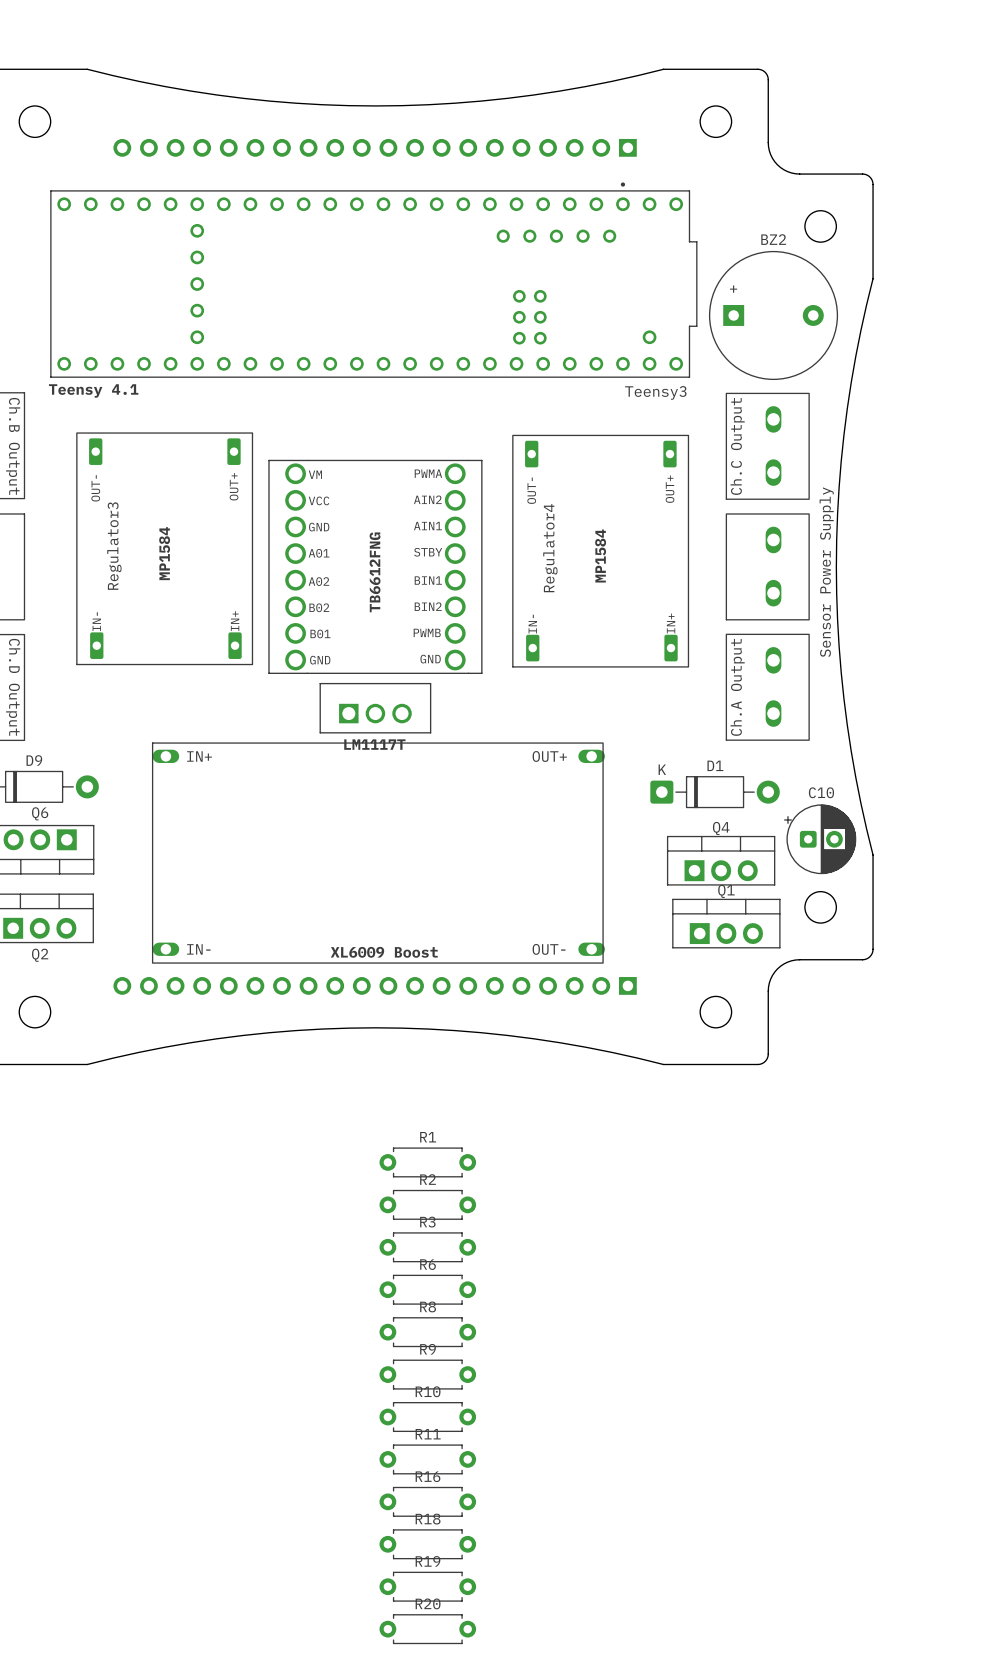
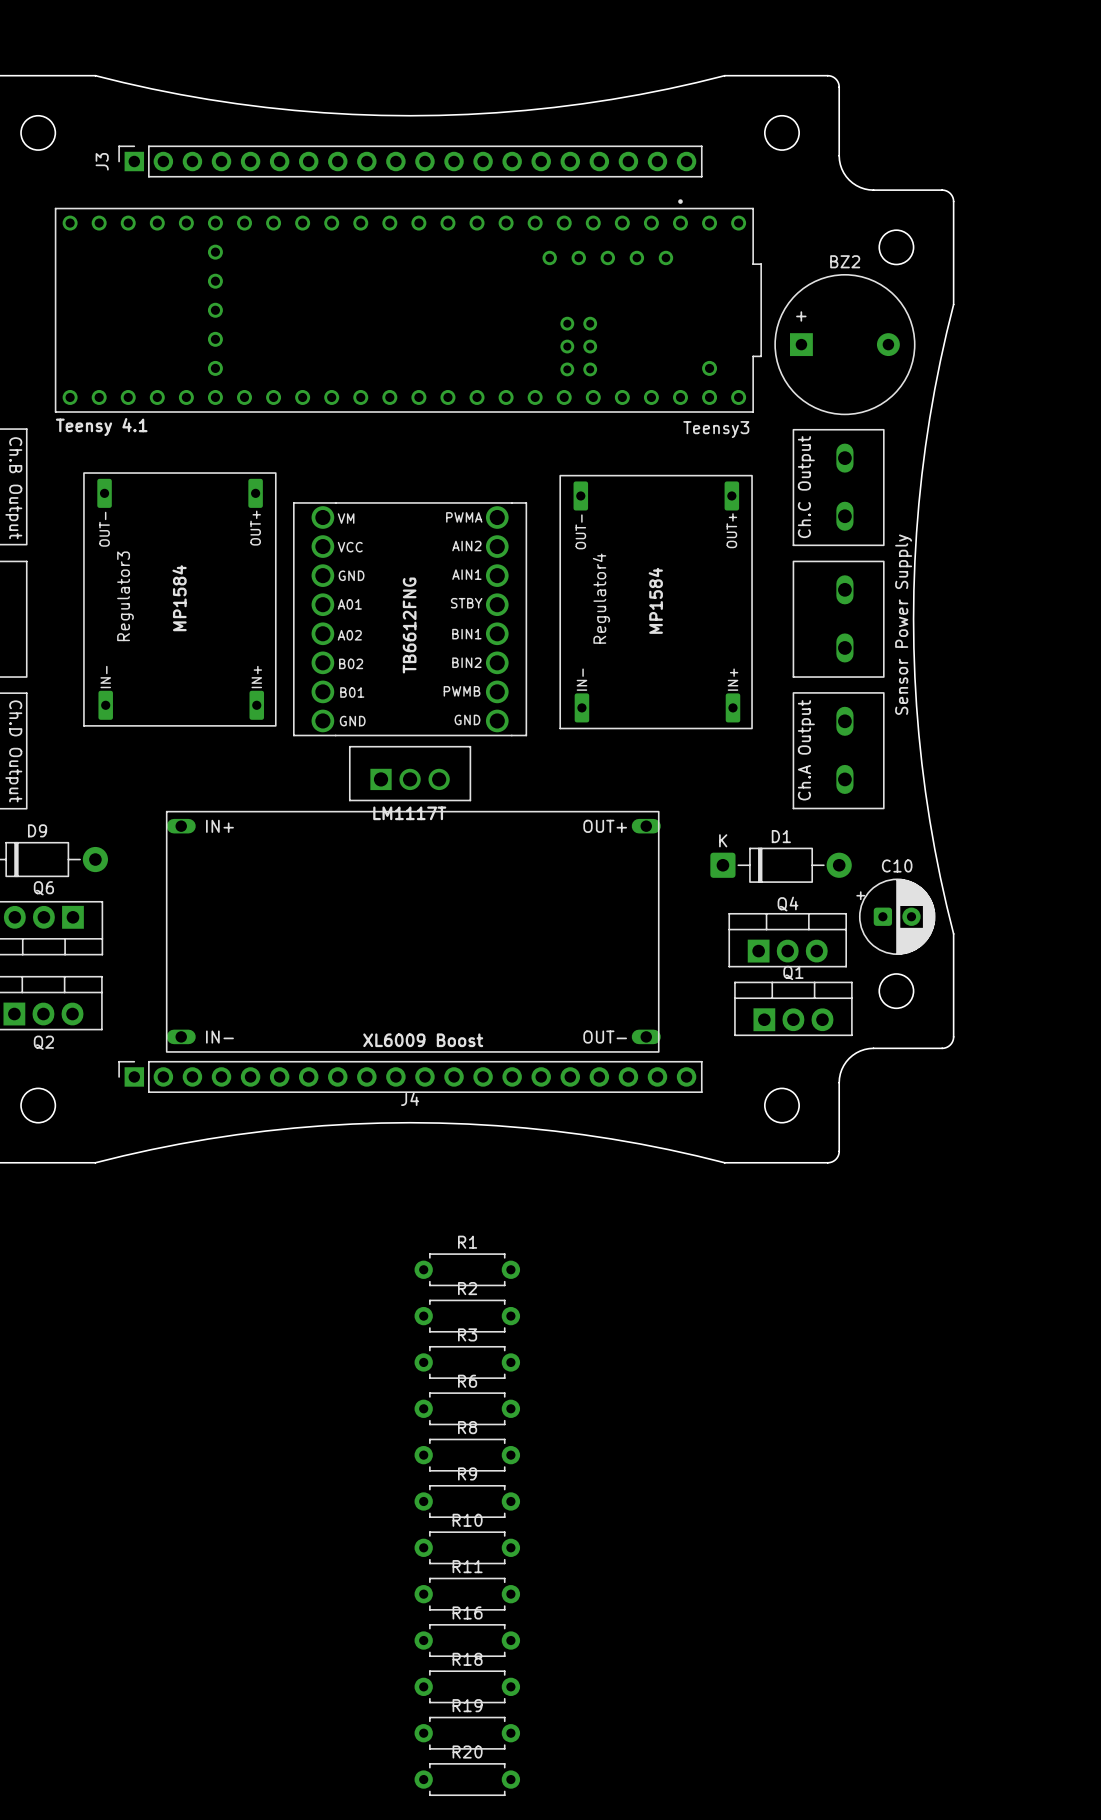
J3 side: bottom (375, 147) -> top (410, 161)
J4 side: bottom (375, 985) -> top (410, 1076)

